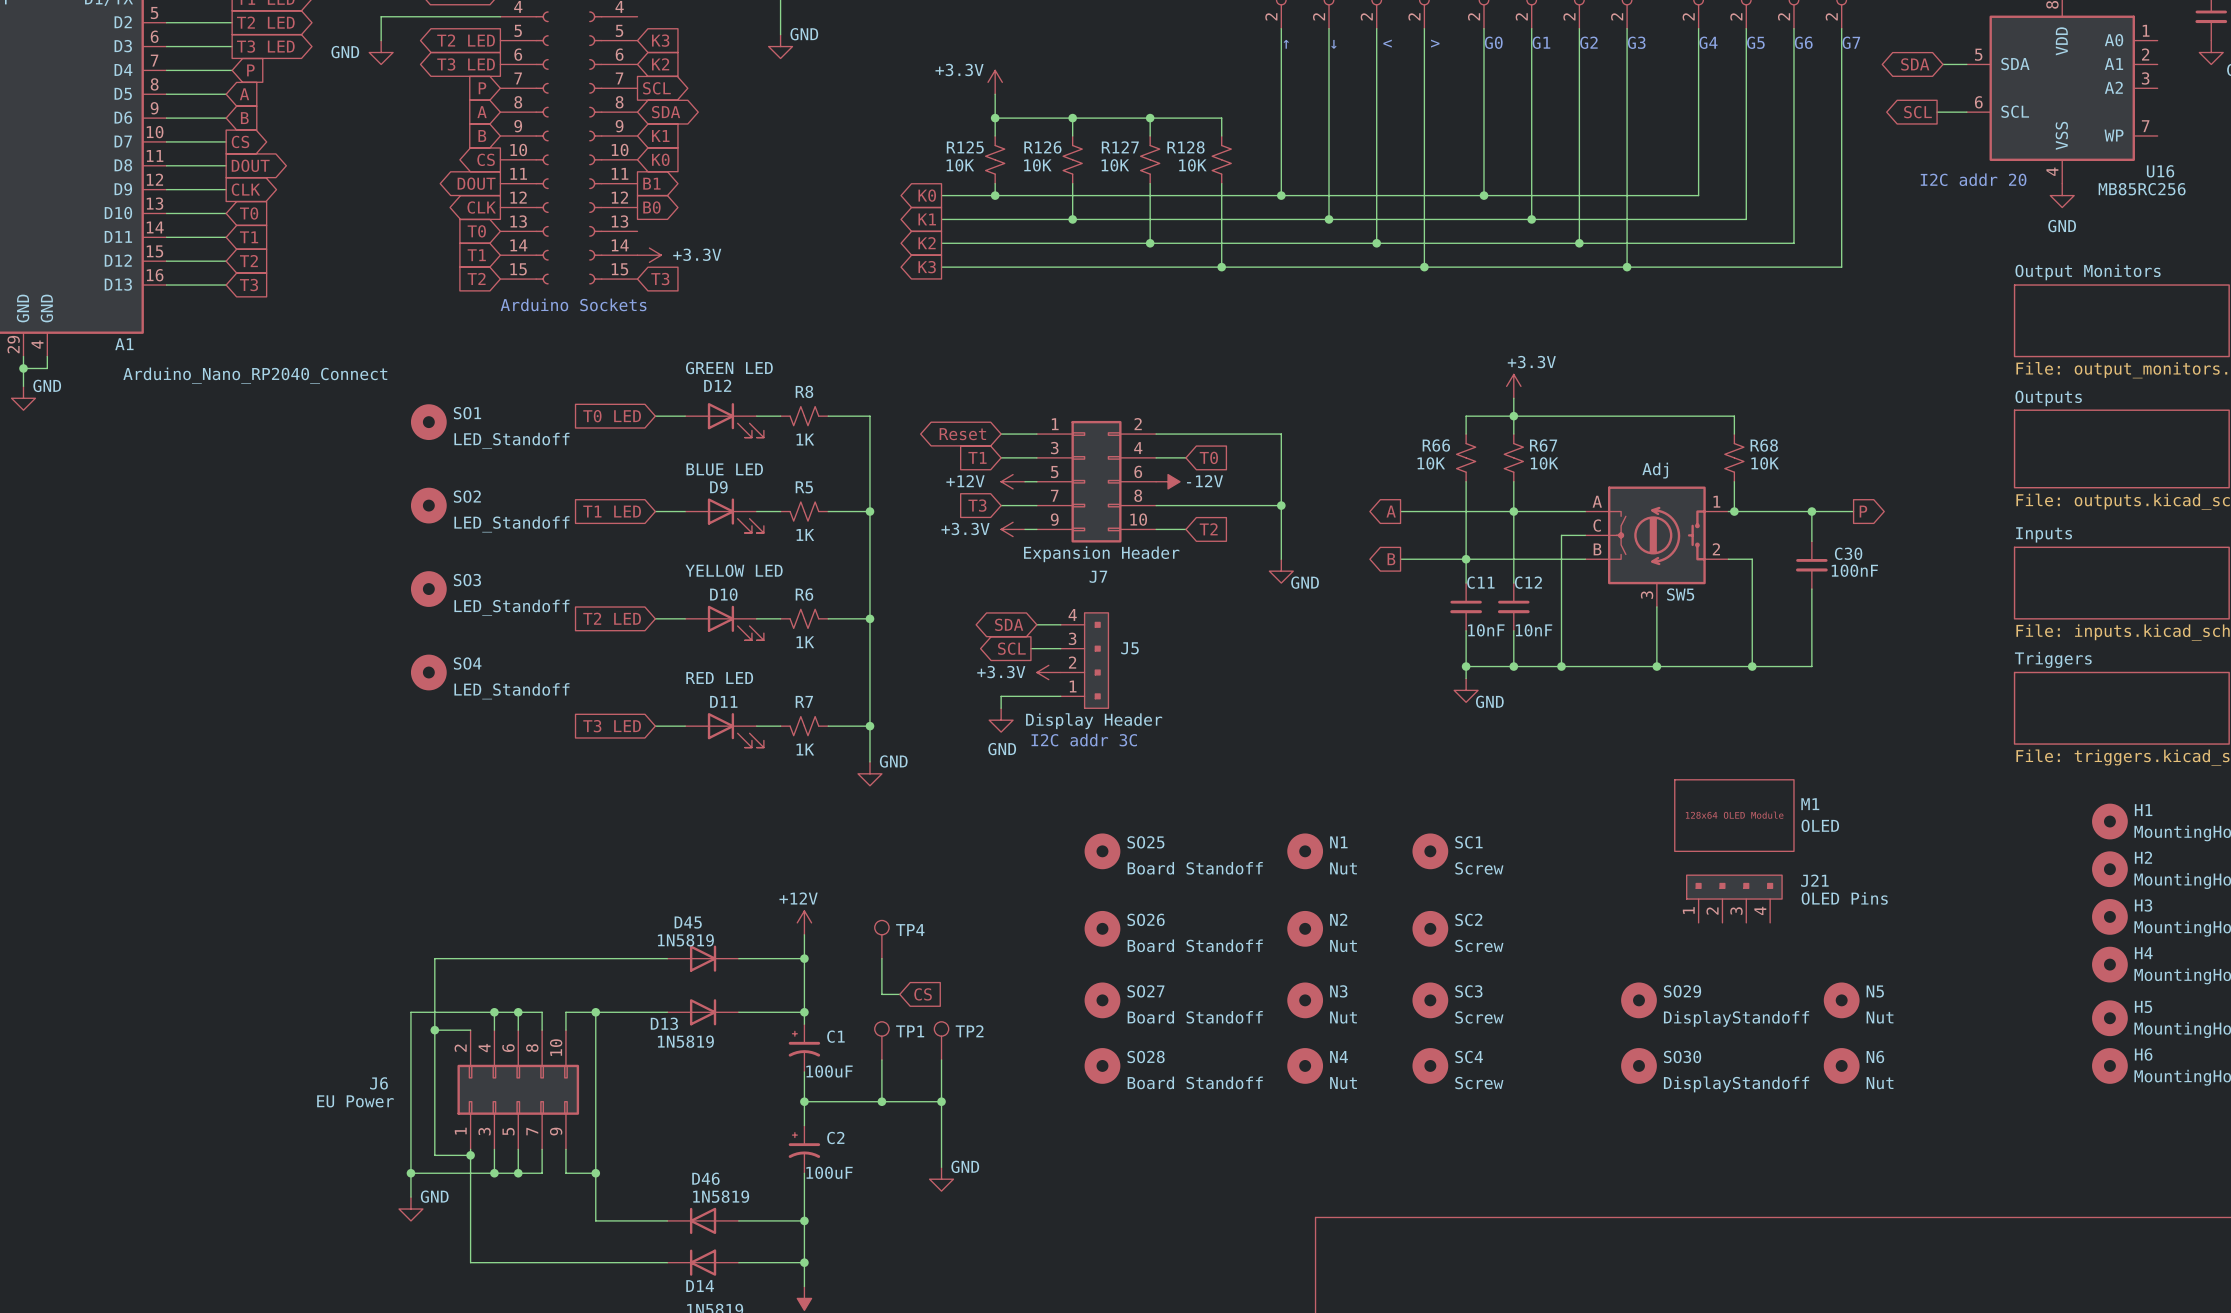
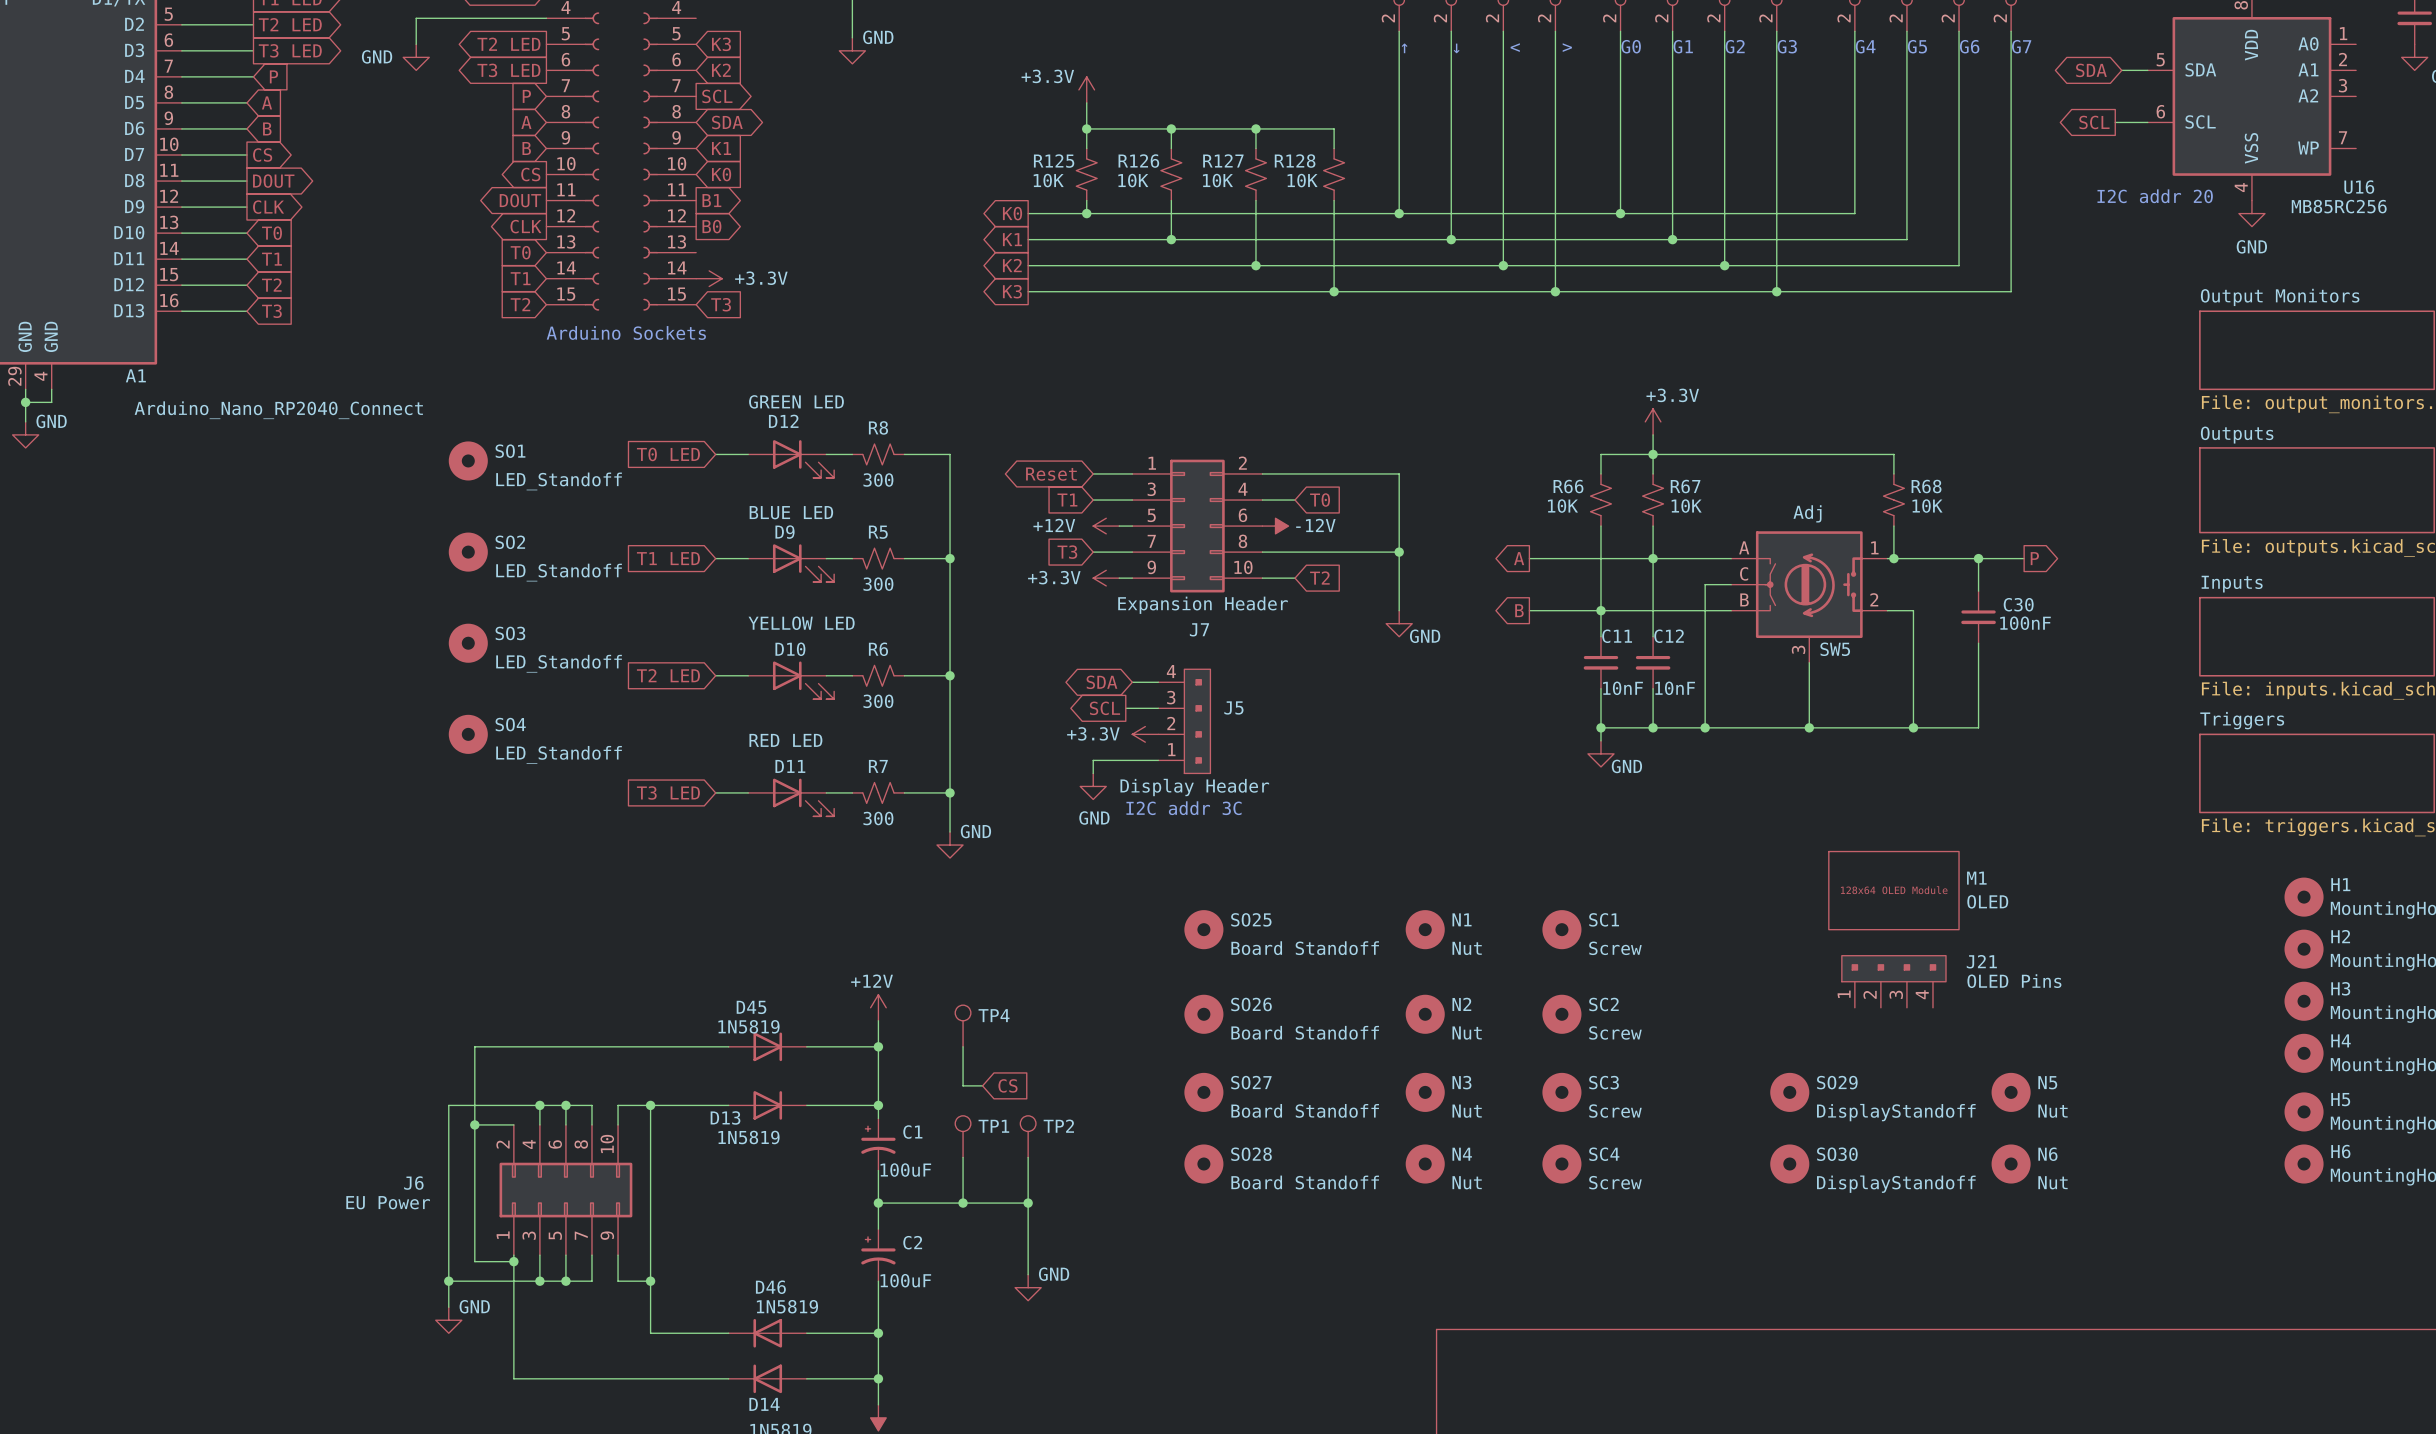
R8 value: 1K (805, 439) -> 300 (878, 480)
R5 value: 1K (805, 534) -> 300 (878, 584)
R6 value: 1K (805, 642) -> 300 (878, 701)
R7 value: 1K (805, 749) -> 300 (878, 818)

